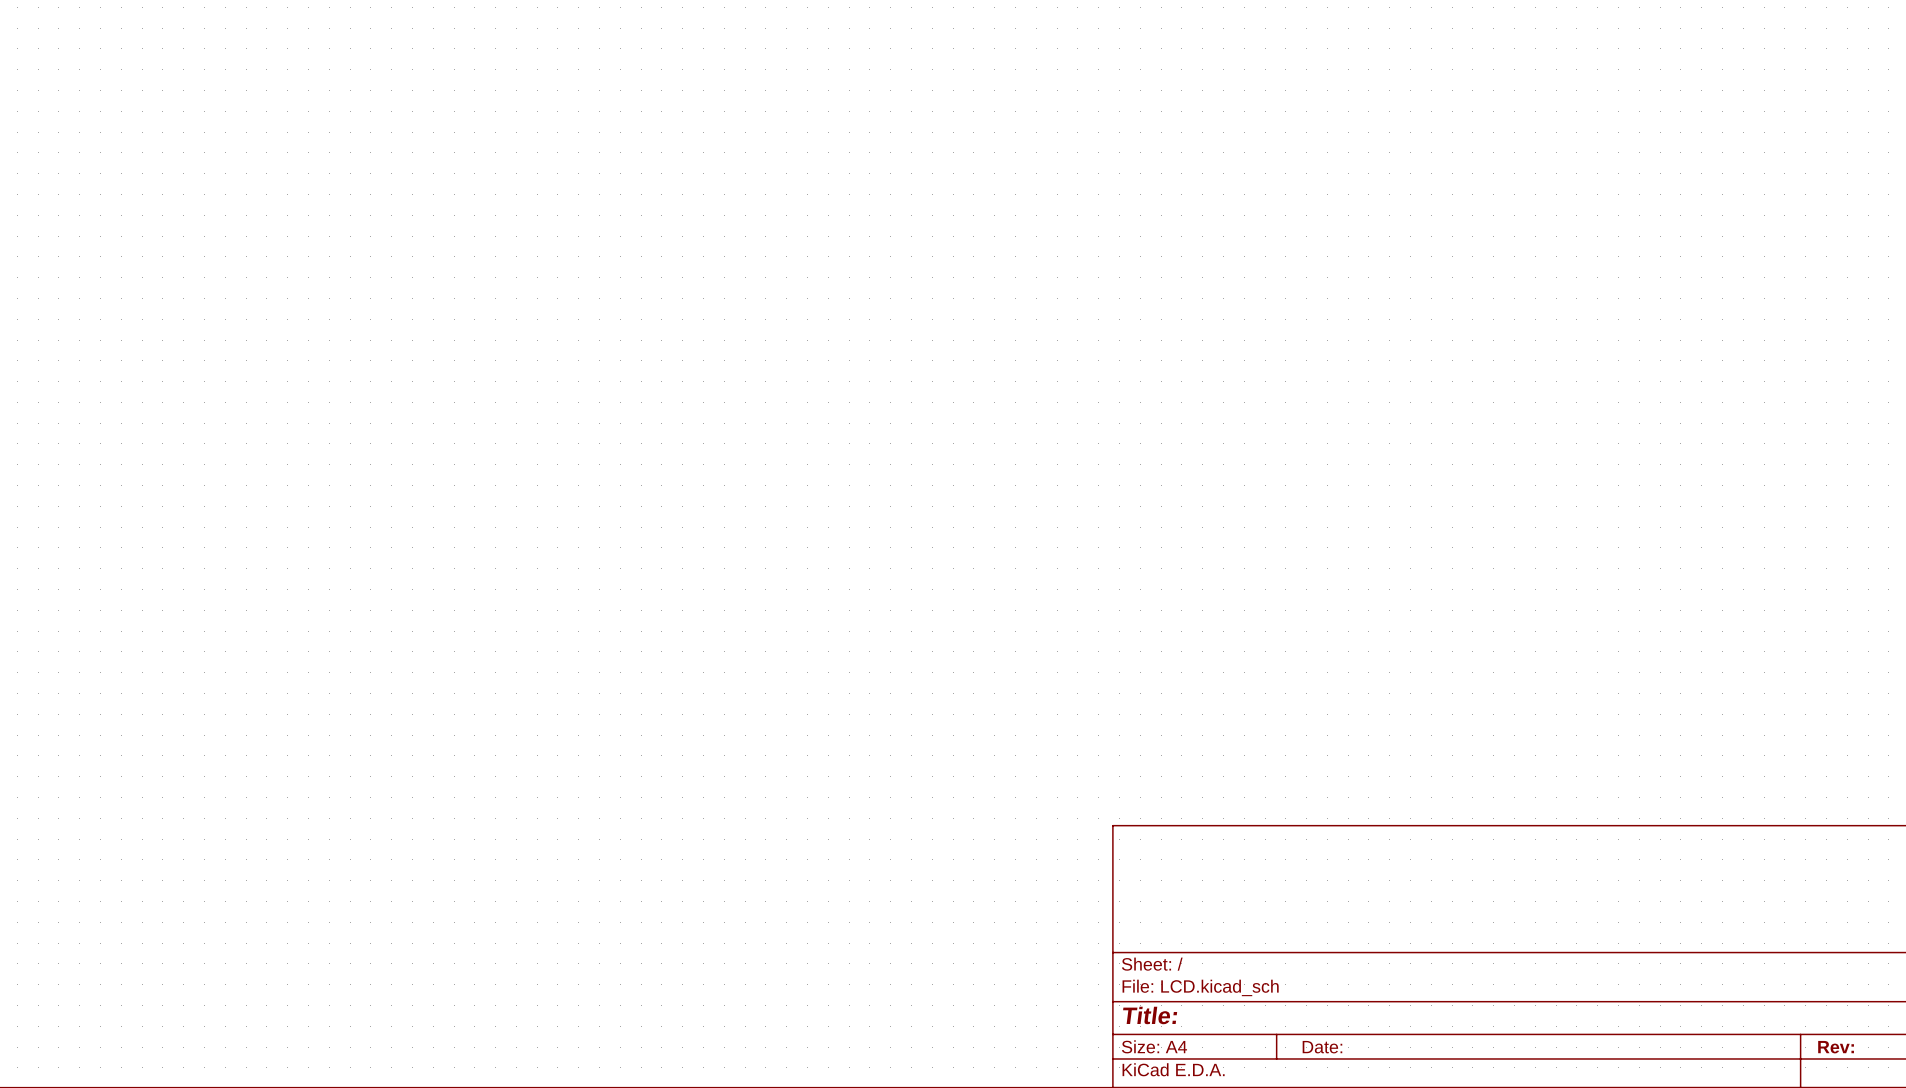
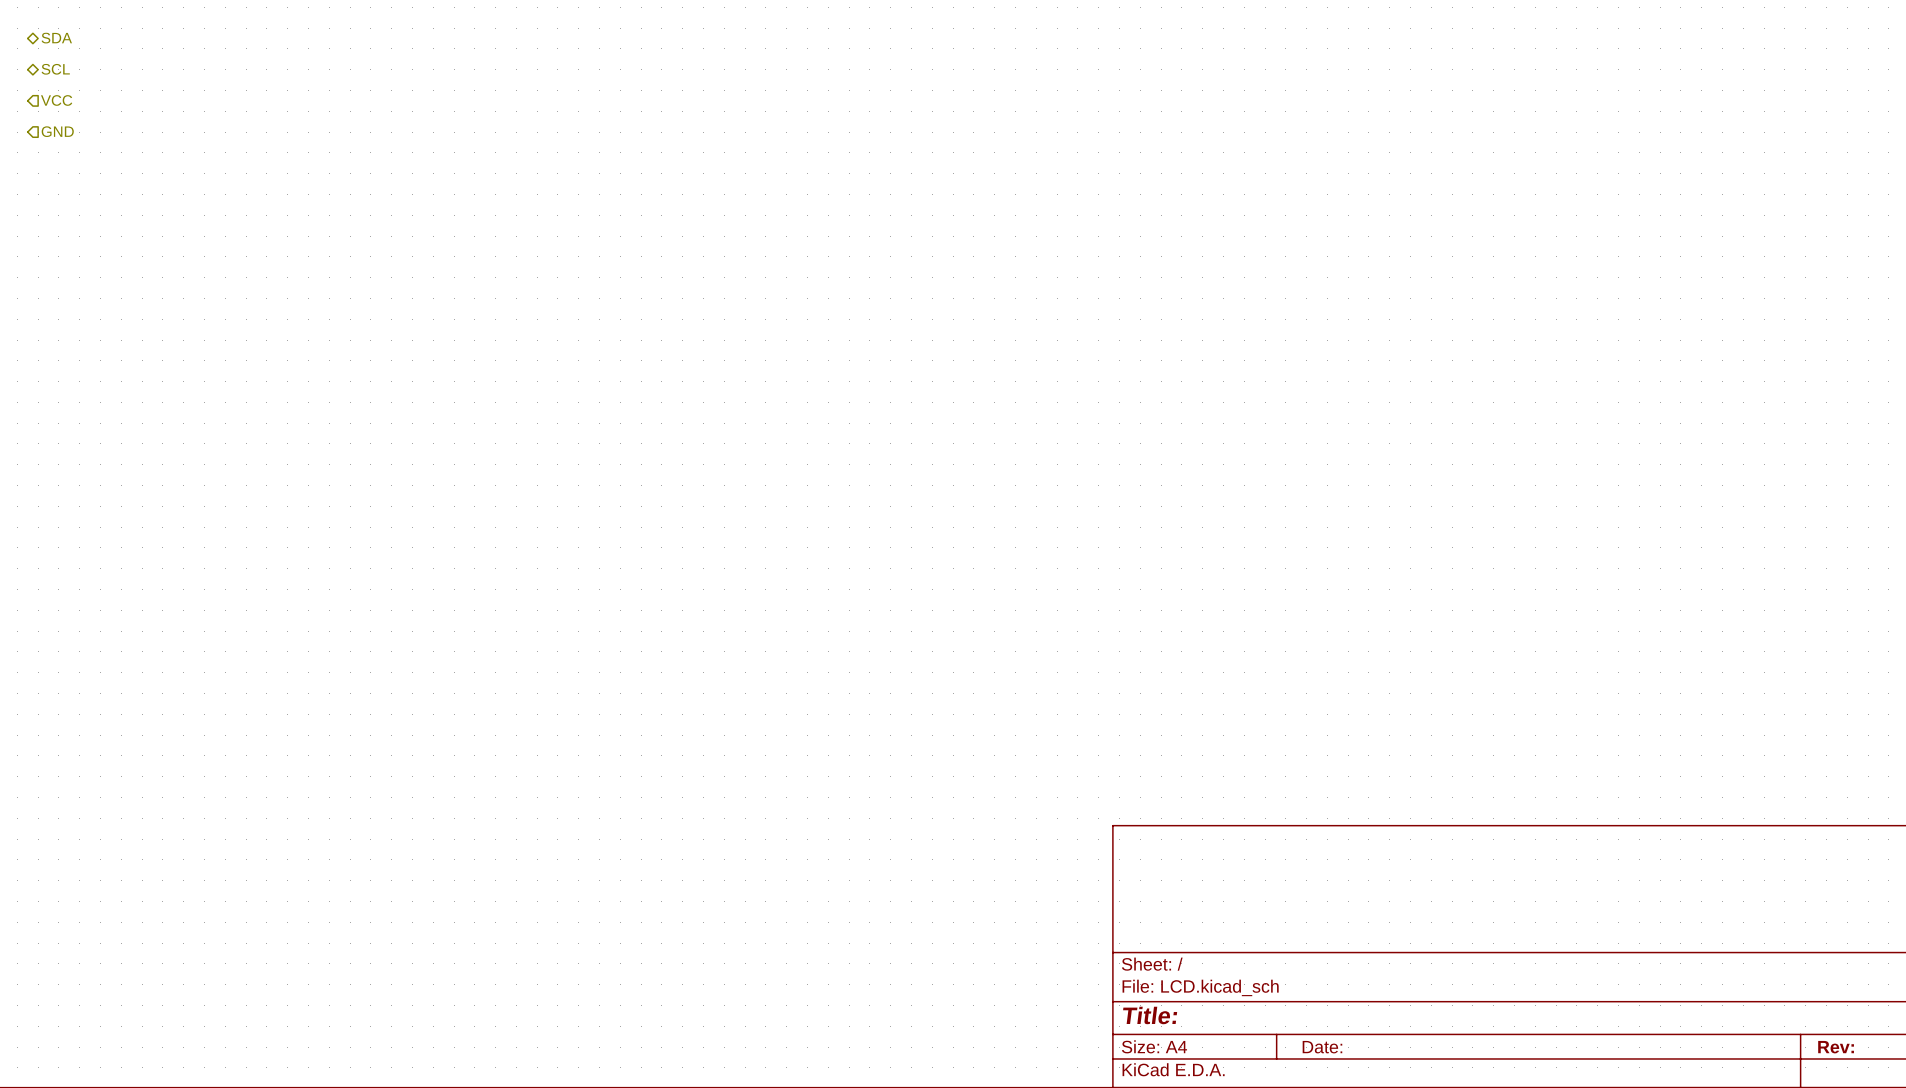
hierarchical label: none -> SDA (56, 38)
hierarchical label: none -> SCL (55, 69)
hierarchical label: none -> VCC (56, 100)
hierarchical label: none -> GND (57, 131)

